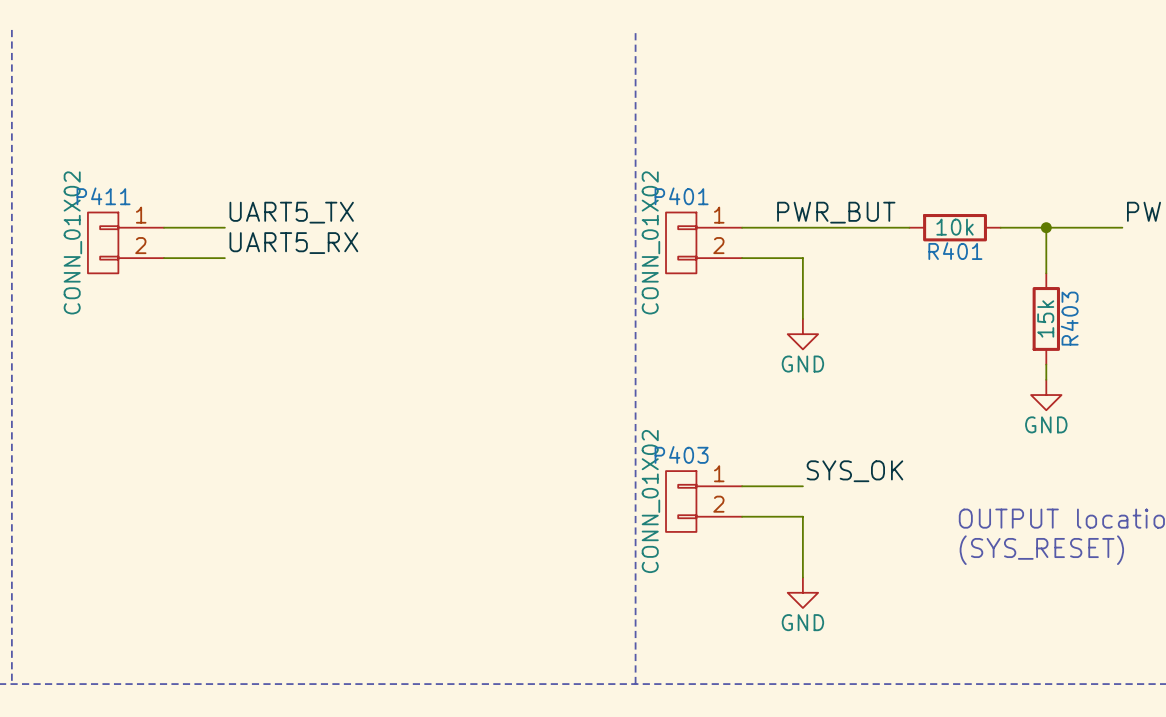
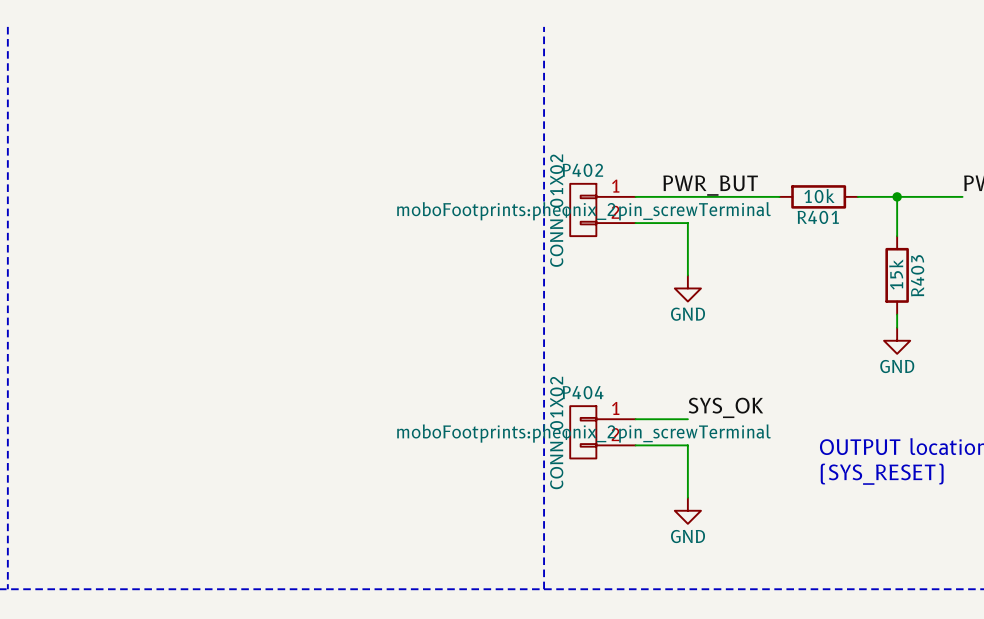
P401 name: P401 (681, 196) -> P402 (582, 170)
label: UART5_TX (291, 212) -> none
wire: (164, 227) (224, 227) -> none
P411: CONN_01X02 (125, 242) -> none
label: UART5_RX (293, 243) -> none
P401 text: none -> moboFootprints:pheonix_2pin_screwTerminal (584, 211)
wire: (164, 258) (224, 258) -> none
P403 name: P403 (681, 454) -> P404 (583, 392)
P403 text: none -> moboFootprints:pheonix_2pin_screwTerminal (584, 433)

